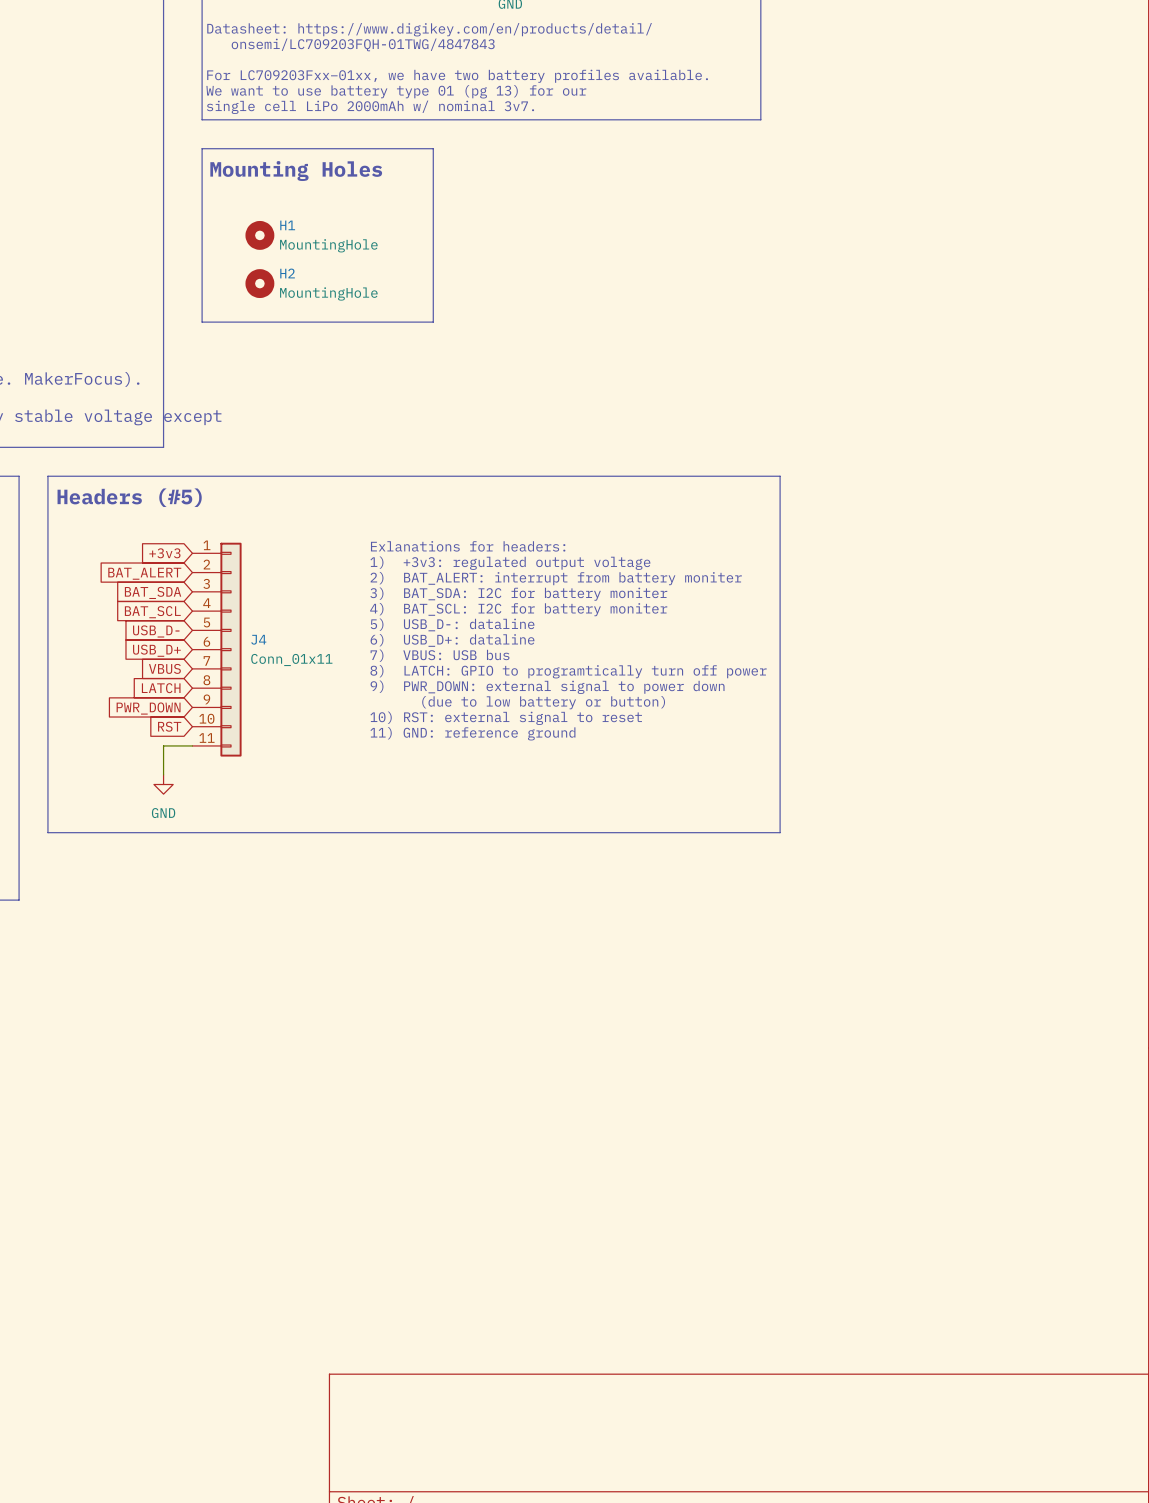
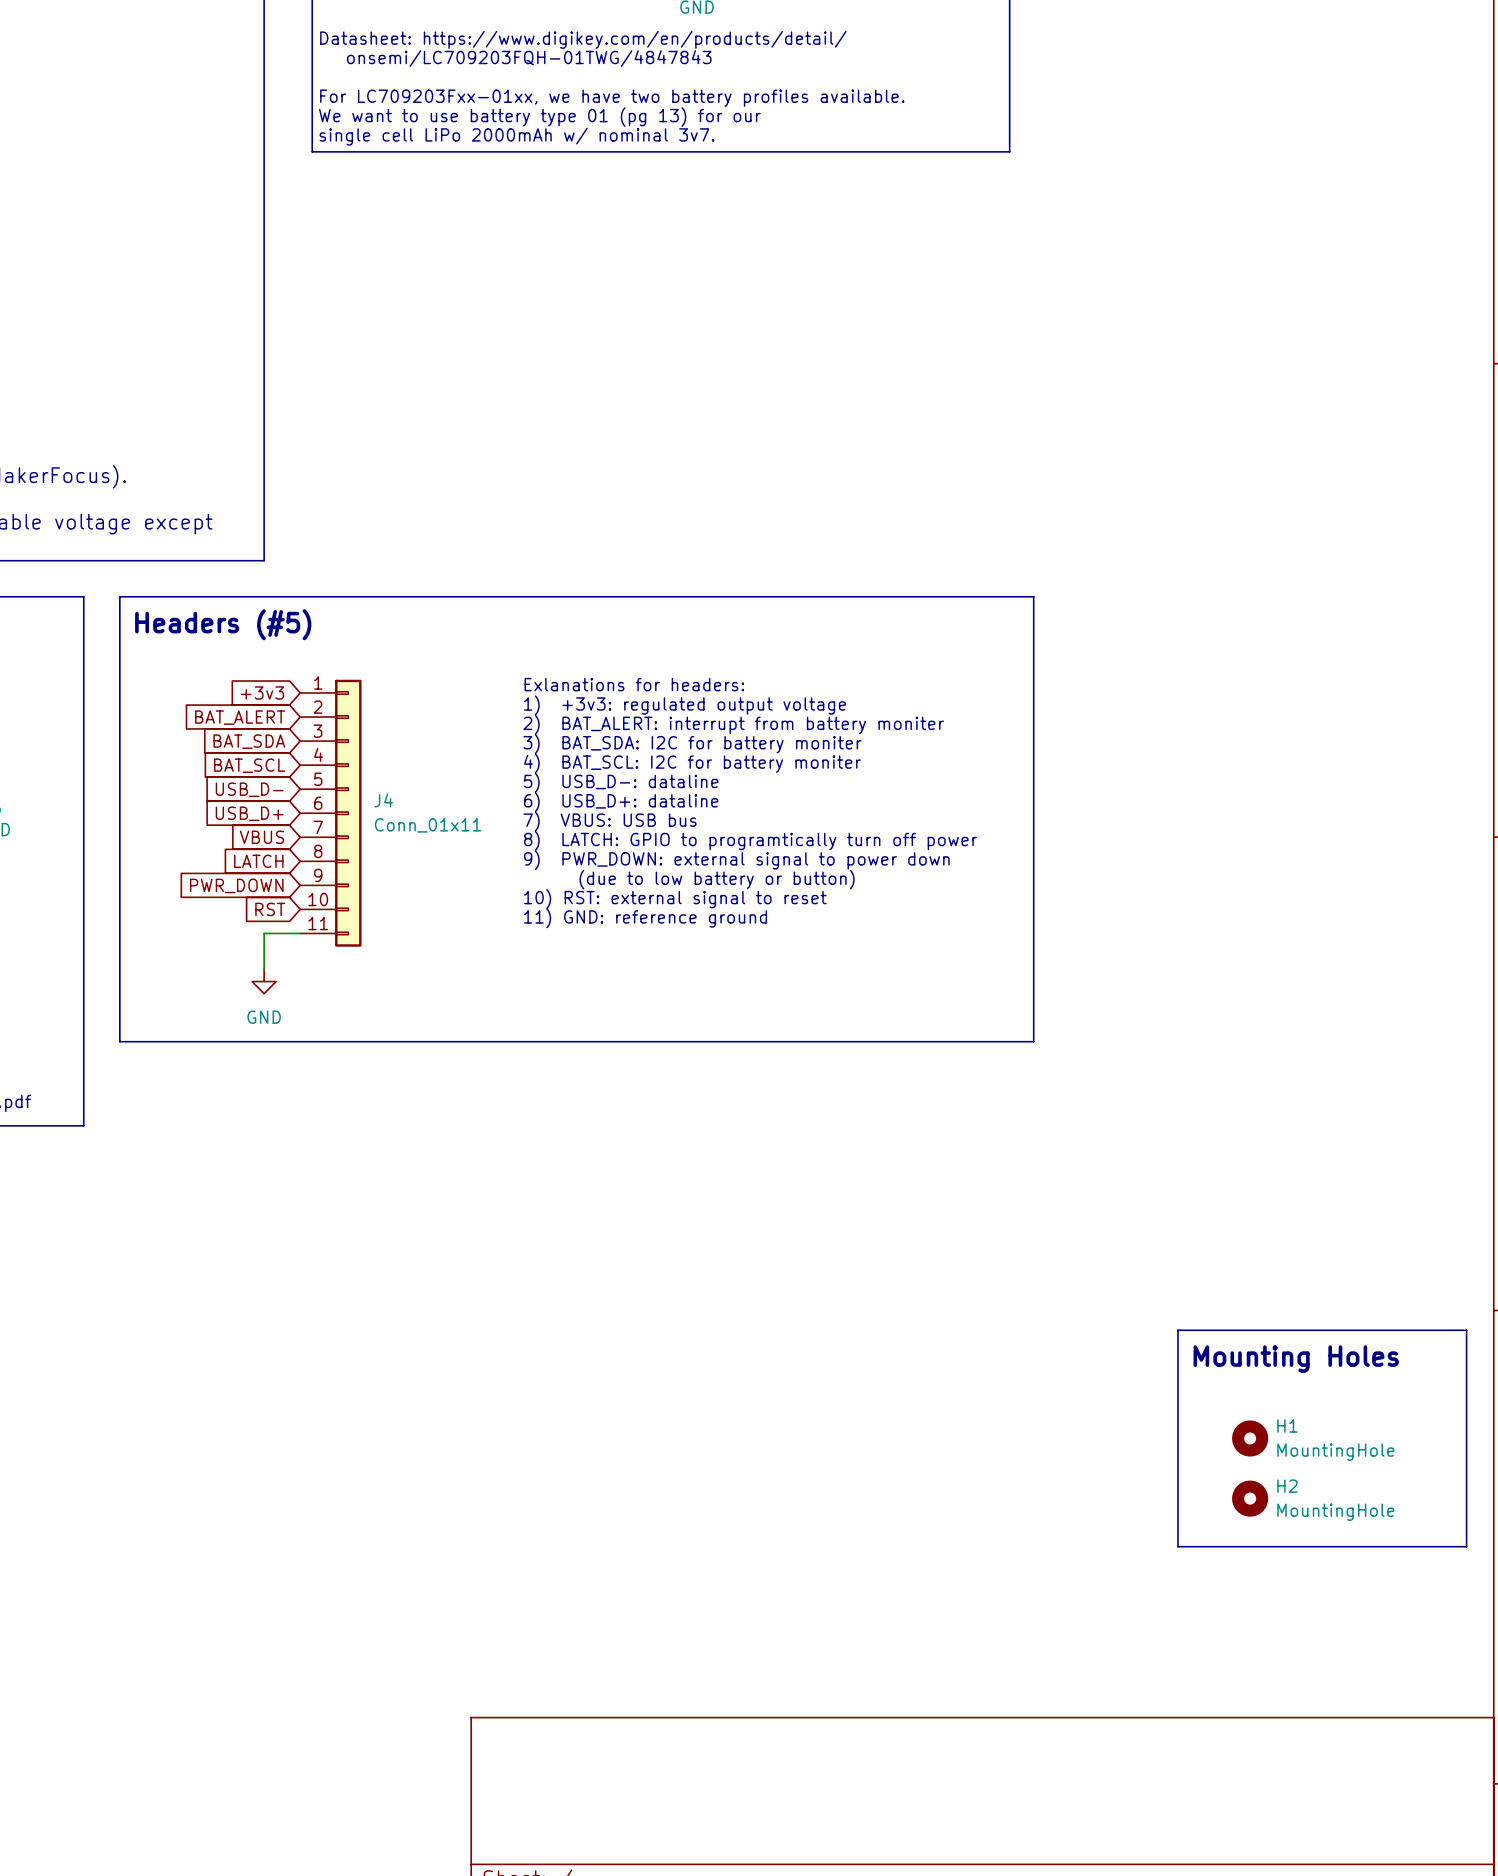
line: (202, 148) (433, 148) (433, 322) (202, 322) (202, 148) -> none
text: Mounting Holes (296, 171) -> none
H1 position: (259, 235) -> (1250, 1438)
H2 position: (259, 283) -> (1250, 1498)
line: none -> (1177, 1330) (1466, 1330) (1466, 1546) (1177, 1546) (1177, 1330)
text: none -> Mounting Holes (1296, 1359)

